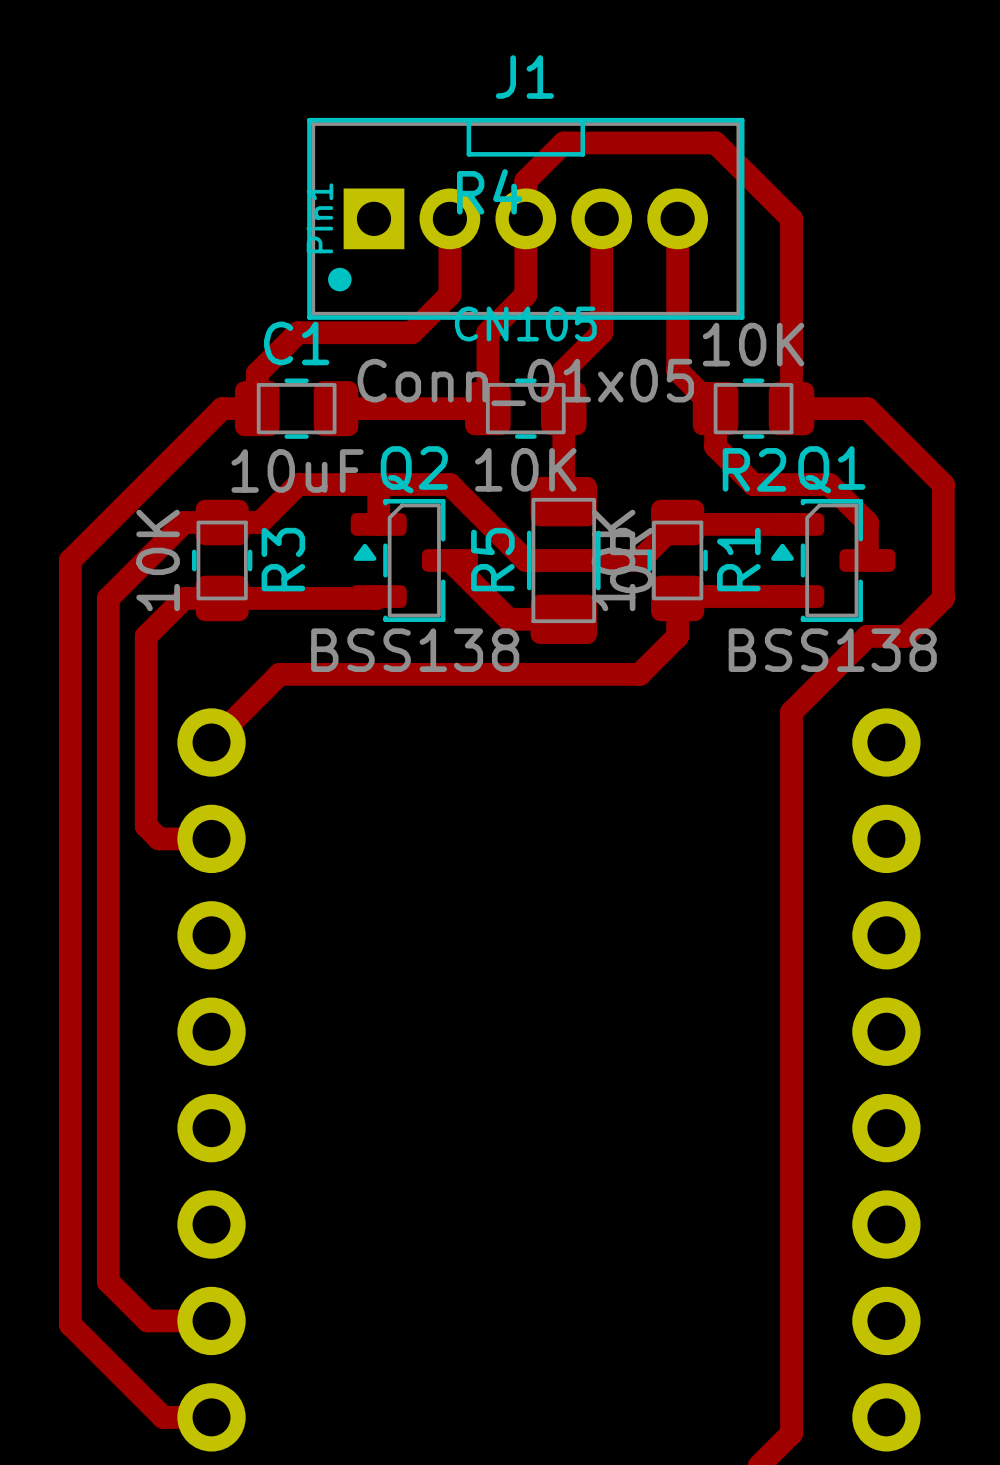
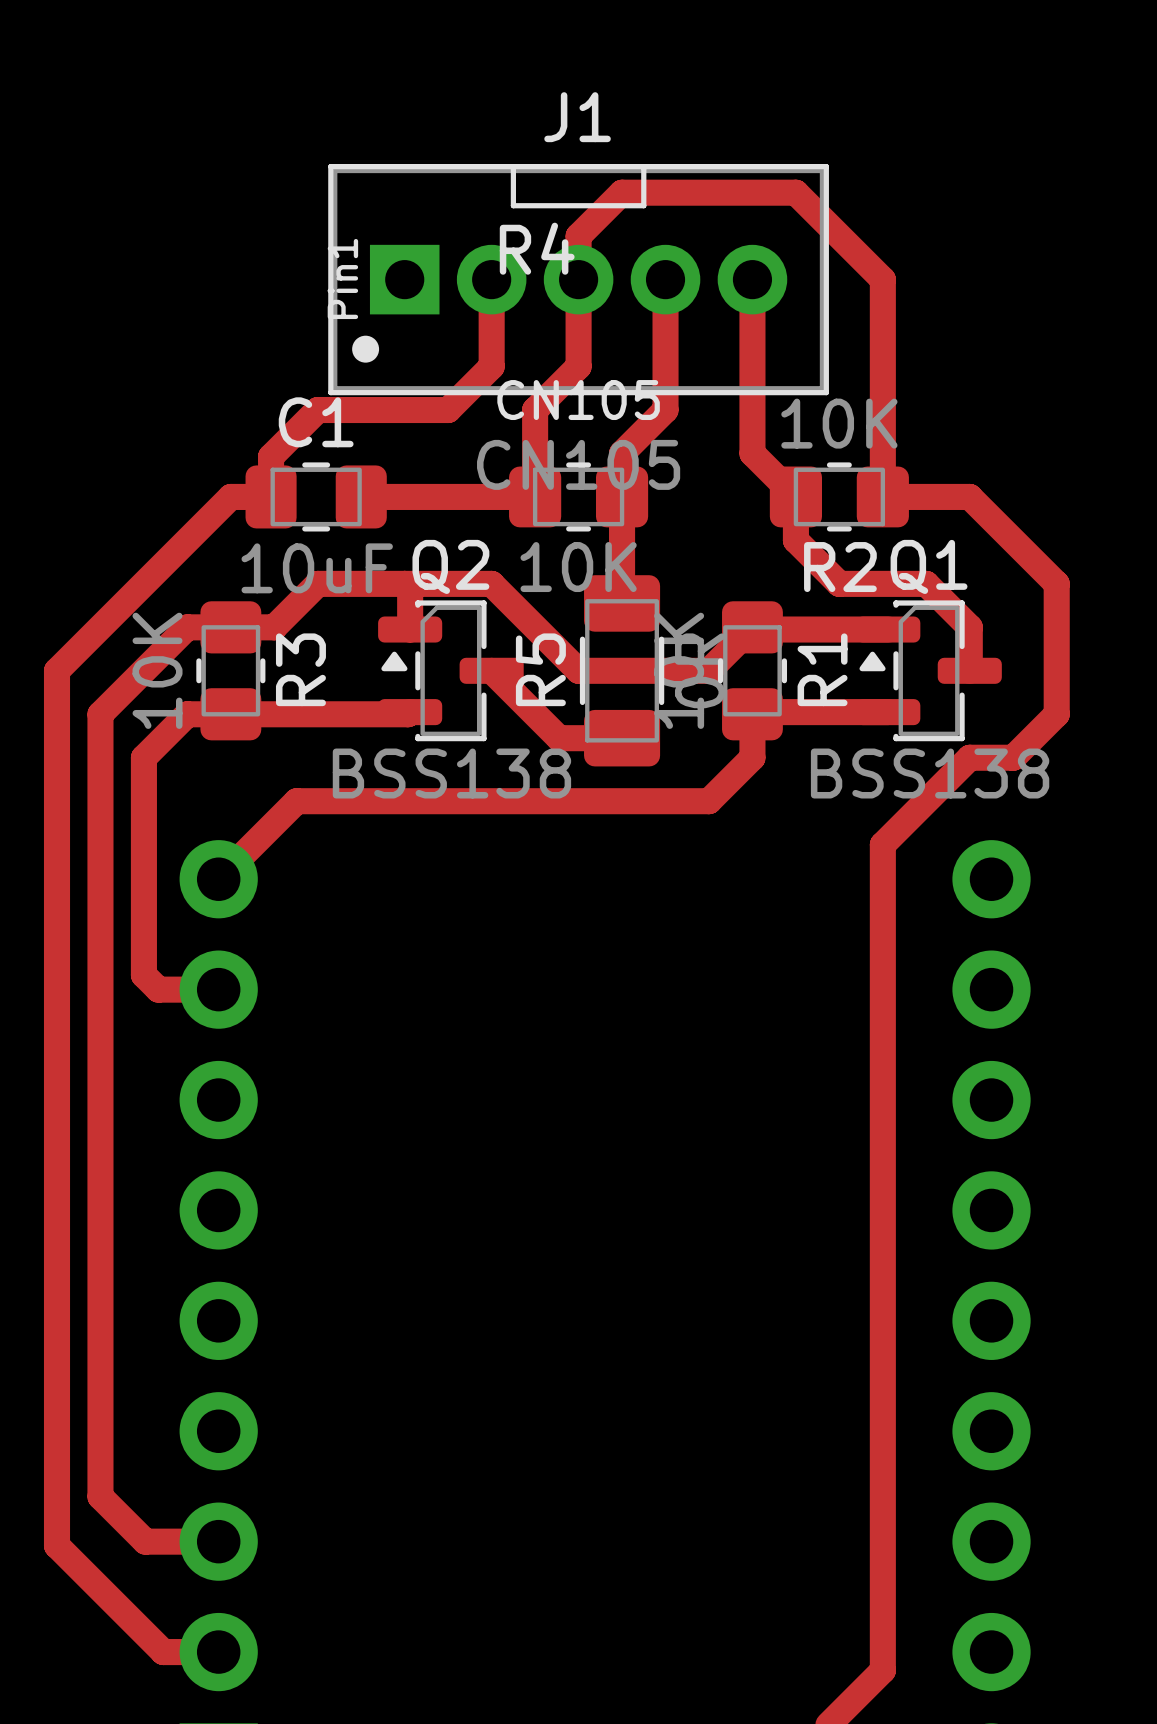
J1 value: Conn_01x05 (525, 382) -> CN105 (578, 464)

